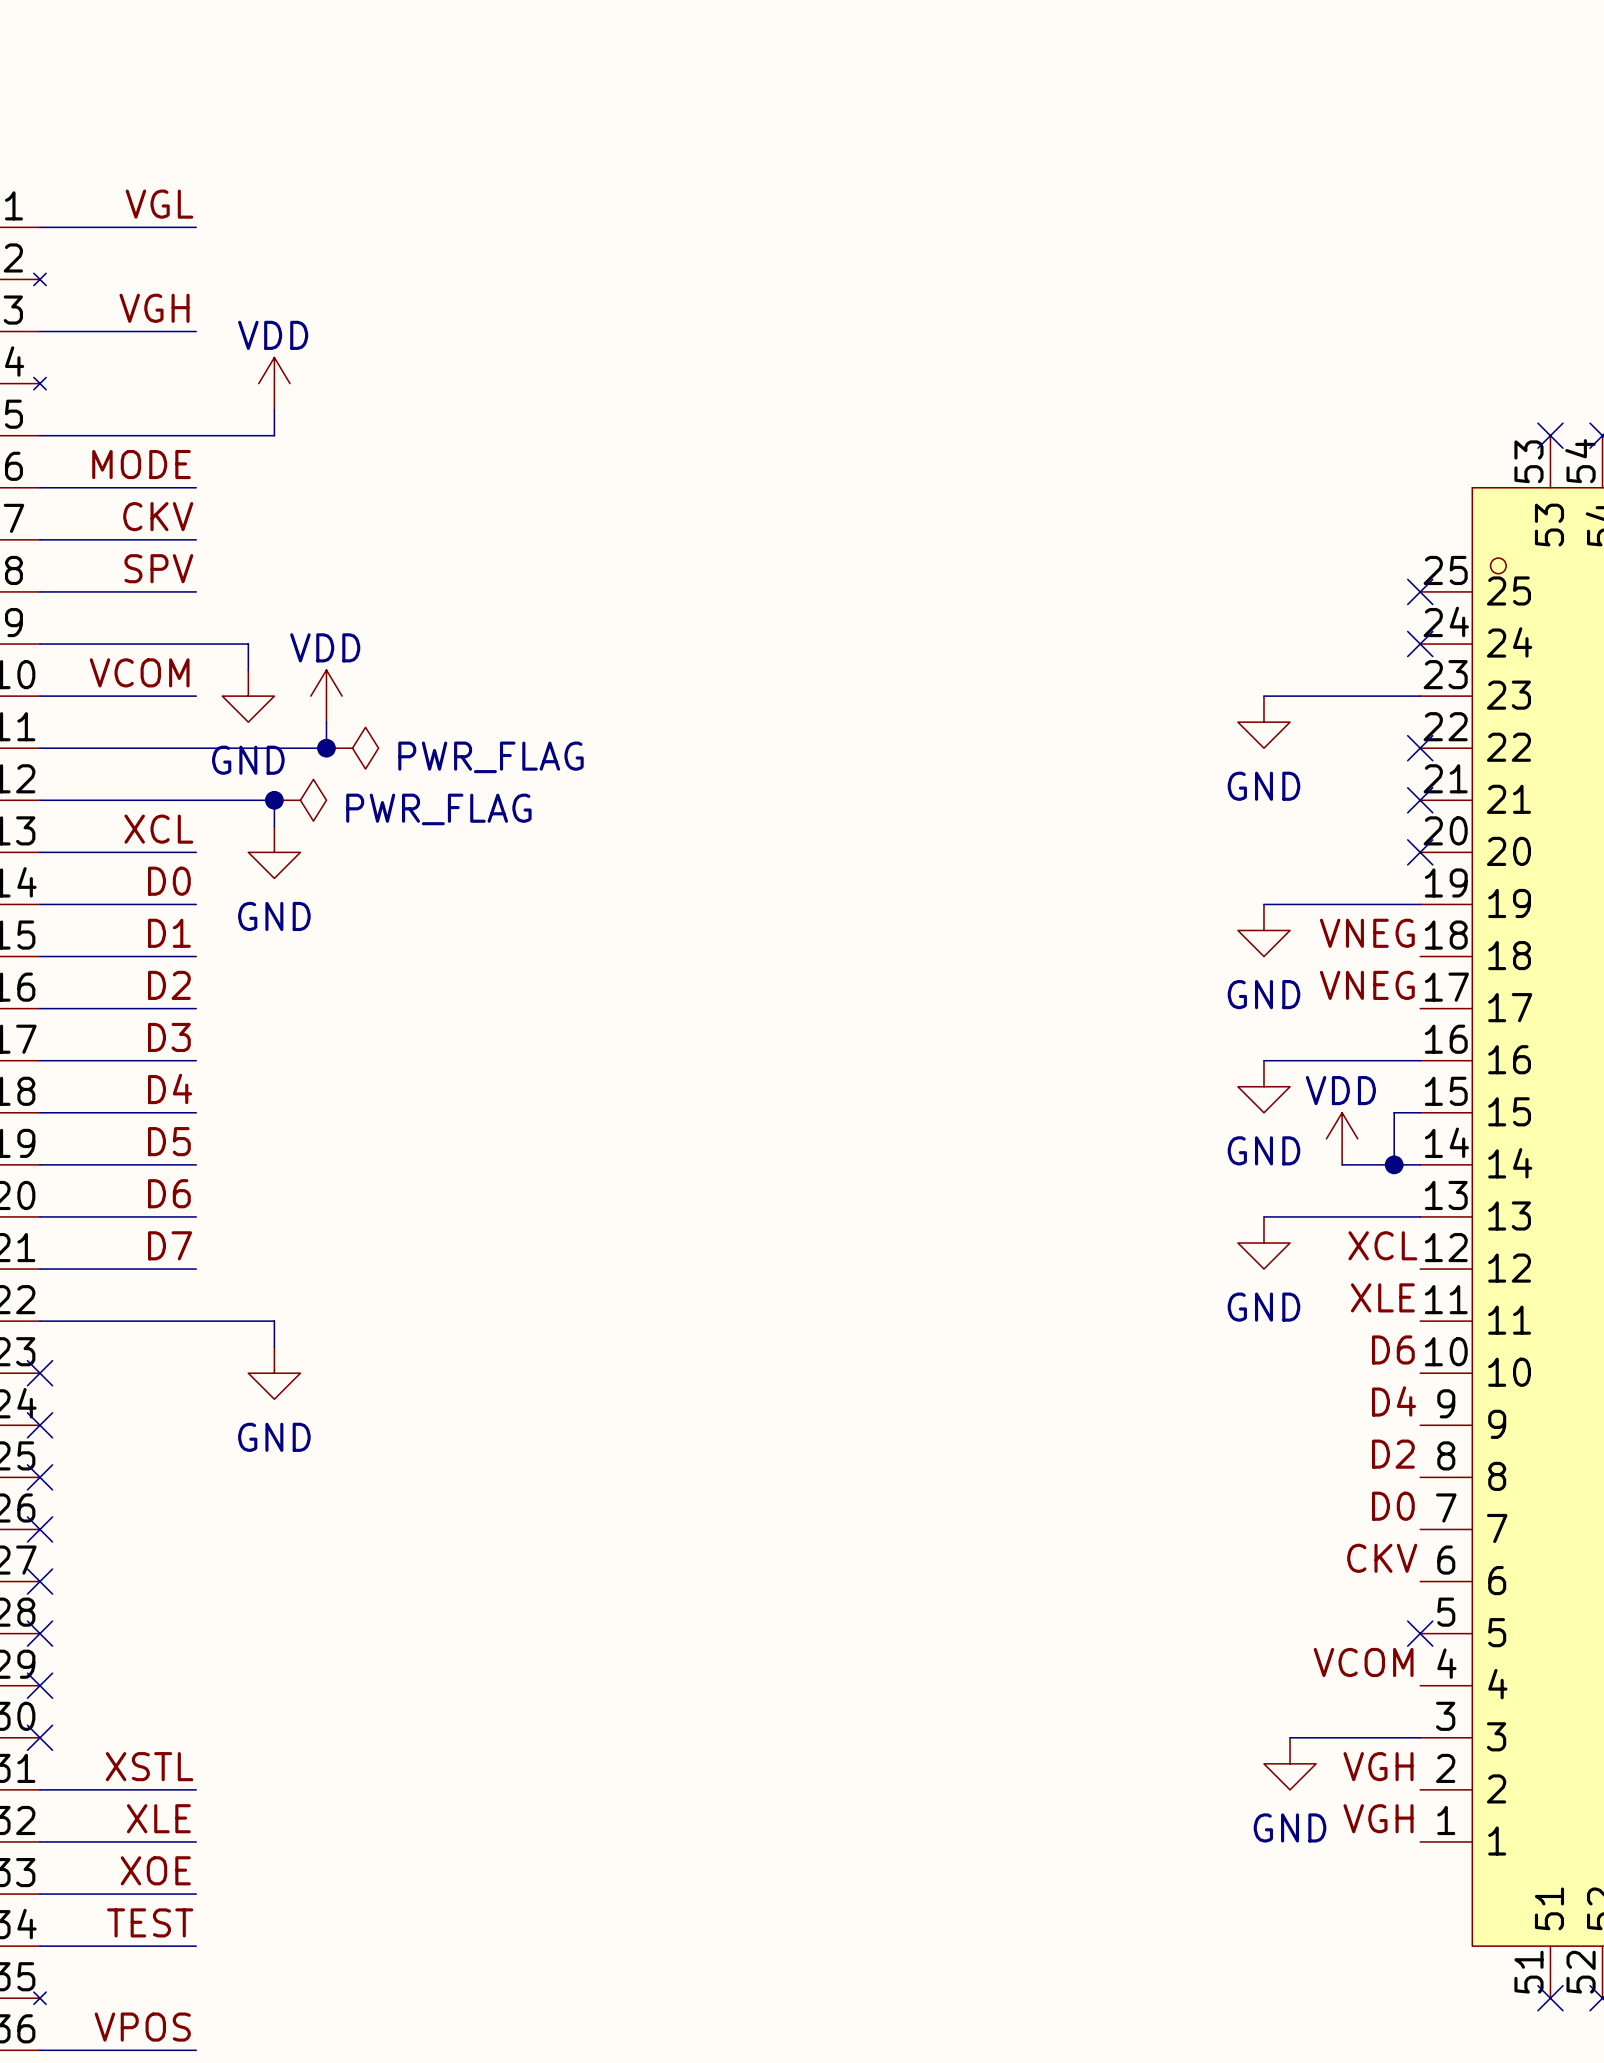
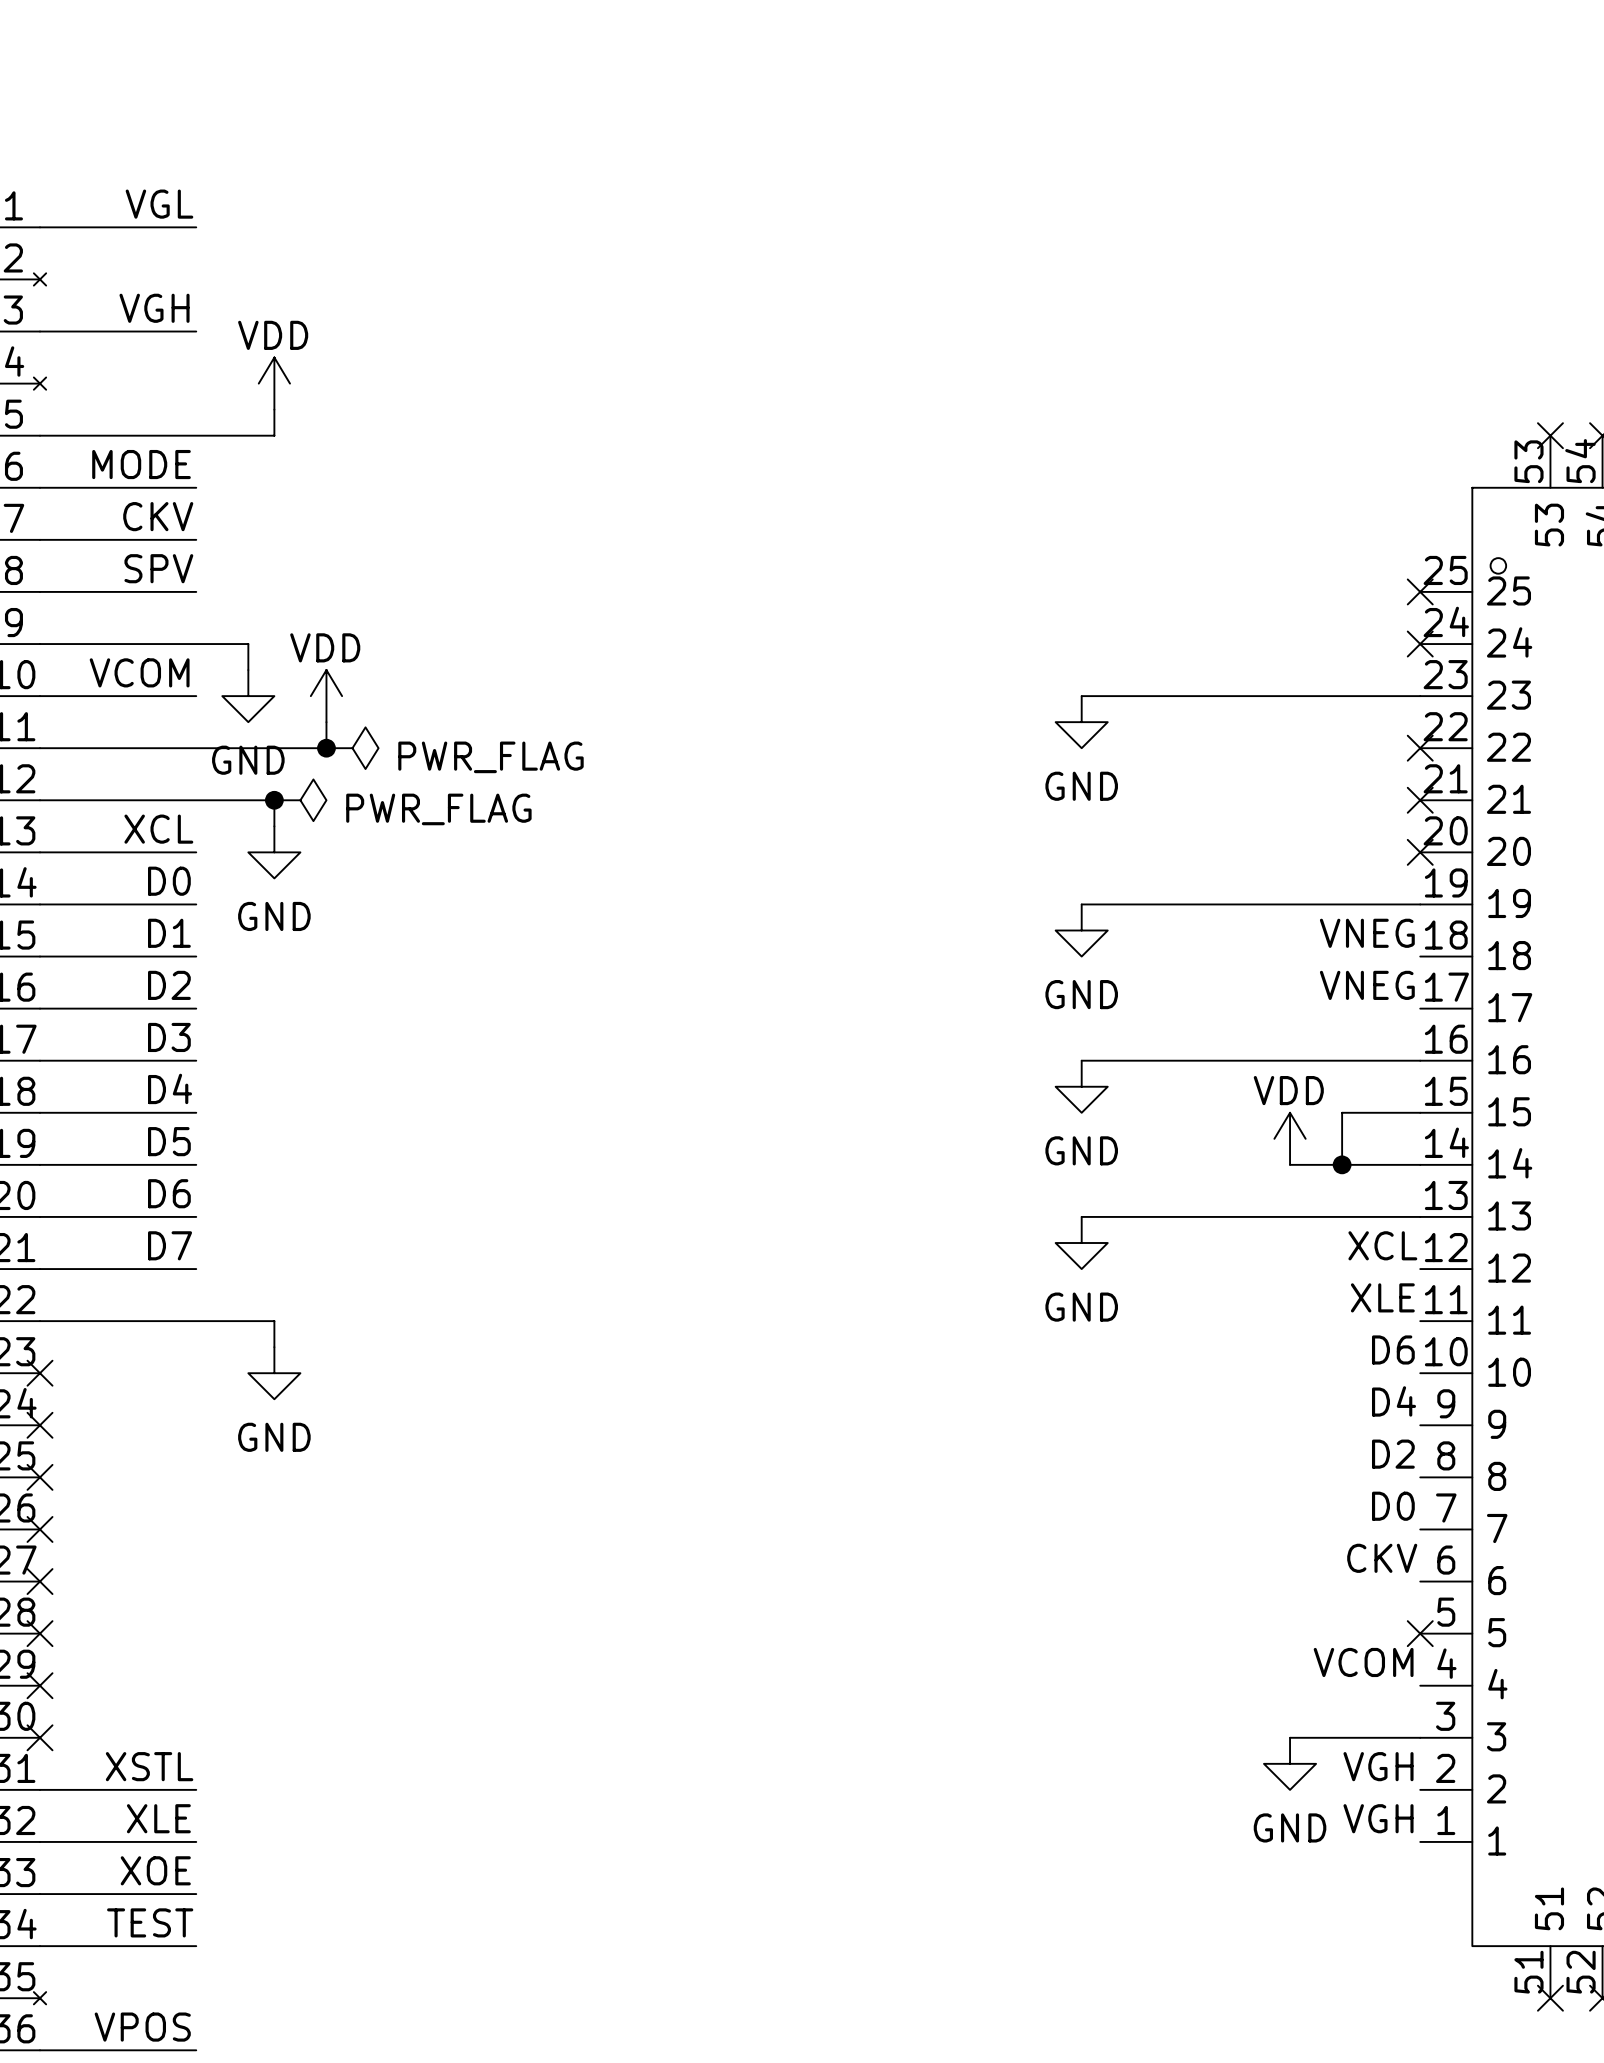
wire: none -> (1081, 696) (1263, 696)
power symbol: none -> GND (1081, 722)
power symbol: GND (1263, 722) -> none
wire: none -> (1081, 904) (1263, 904)
power symbol: none -> GND (1081, 930)
power symbol: GND (1263, 930) -> none
wire: none -> (1081, 1060) (1263, 1060)
power symbol: none -> GND (1081, 1086)
power symbol: GND (1263, 1086) -> none
wire: (1394, 1112) (1394, 1164) -> (1394, 1112) (1342, 1112) (1342, 1164) (1290, 1164)
power symbol position: VDD (1342, 1138) -> VDD (1290, 1138)
junction position: (1394, 1164) -> (1342, 1164)
wire: none -> (1081, 1216) (1263, 1216)
power symbol: none -> GND (1081, 1243)
power symbol: GND (1263, 1243) -> none

